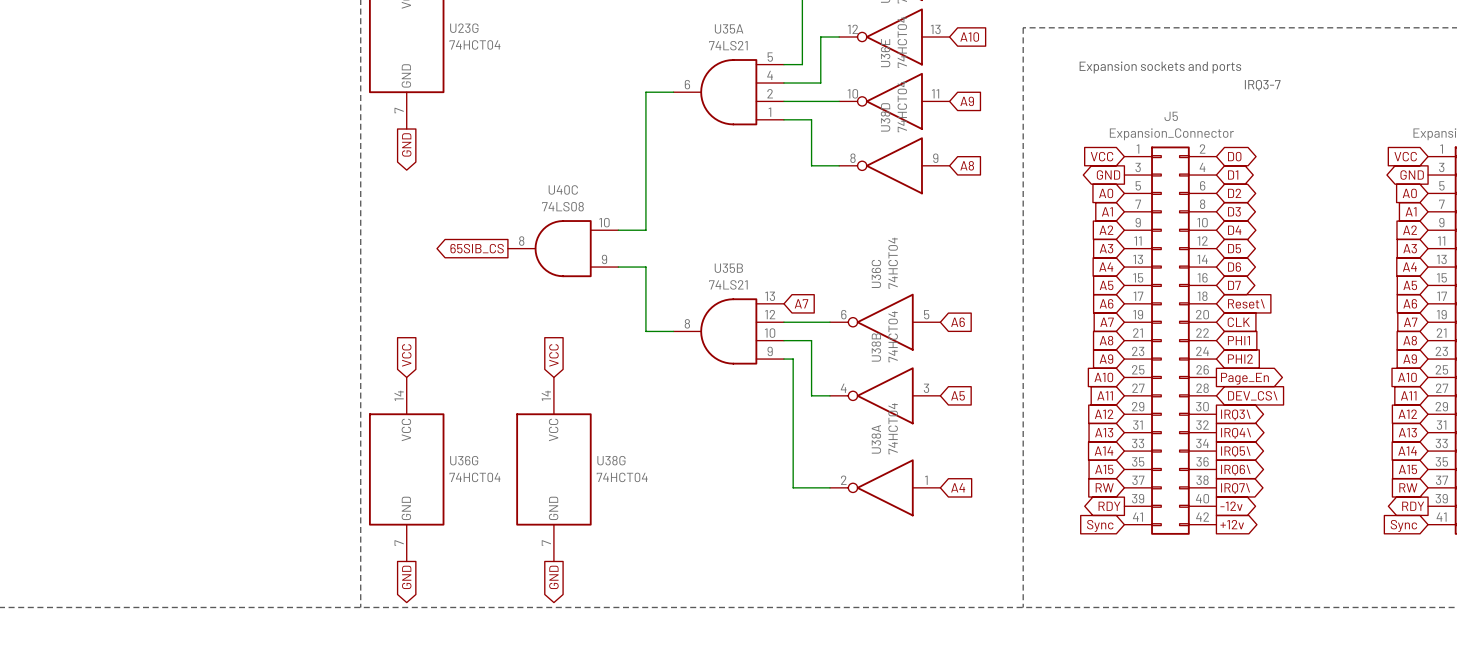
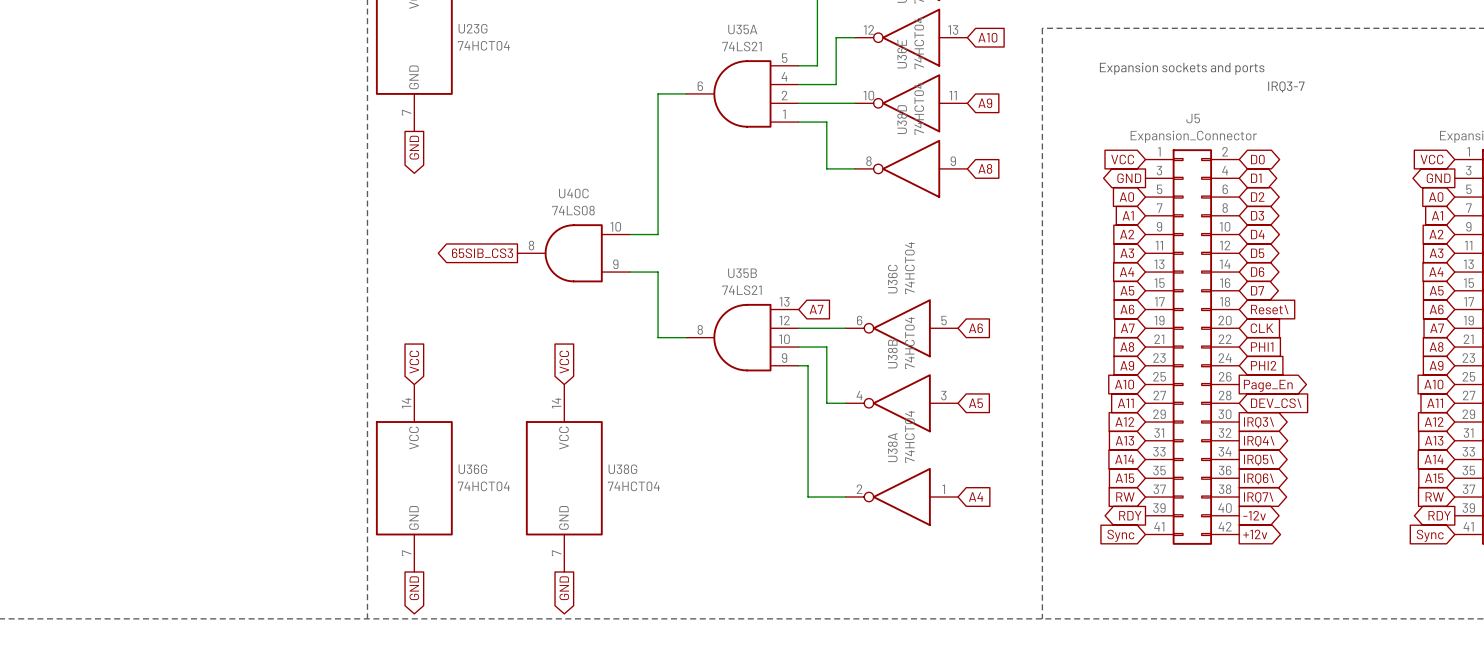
global label: 65SIB_CS (477, 248) -> 65SIB_CS3 (482, 253)

